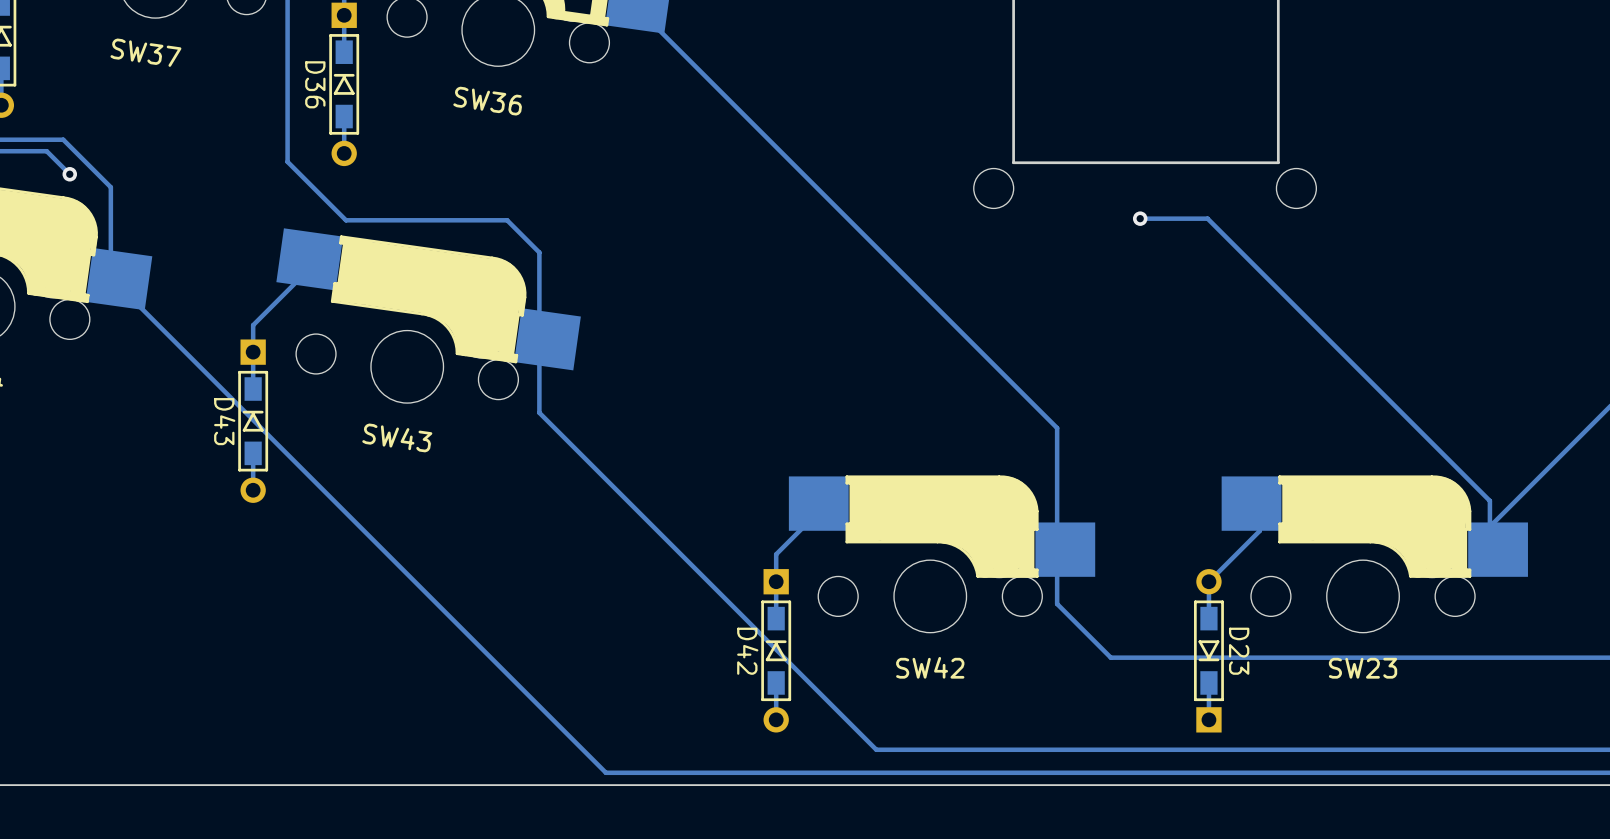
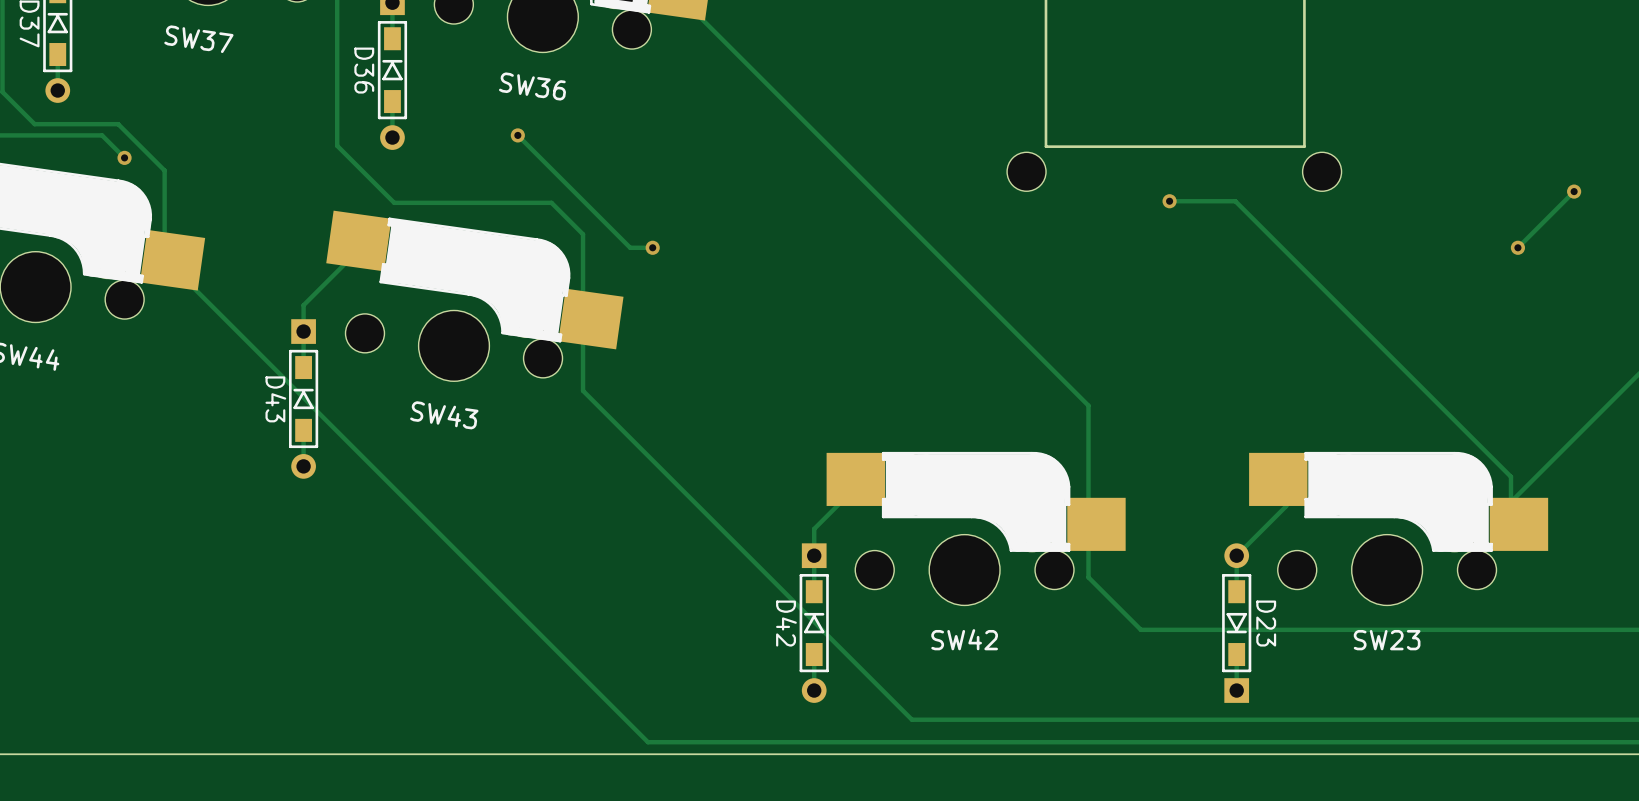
track: none -> (517, 135) (630, 247) (652, 247)
via: none -> (517, 135)
track: none -> (1574, 191) (1517, 247)
via: none -> (1574, 191)
via: none -> (652, 247)
via: none -> (1517, 247)

